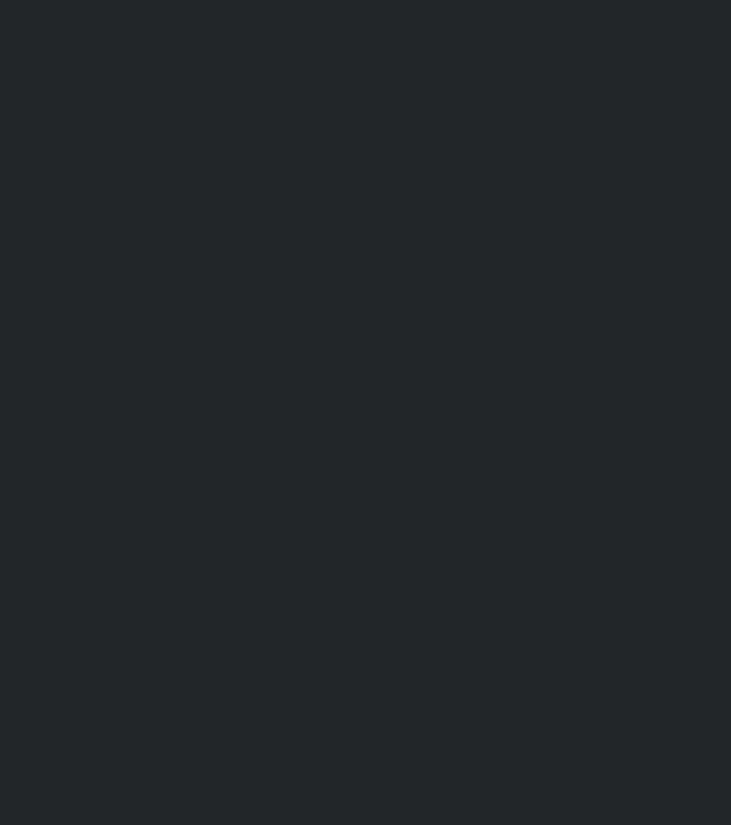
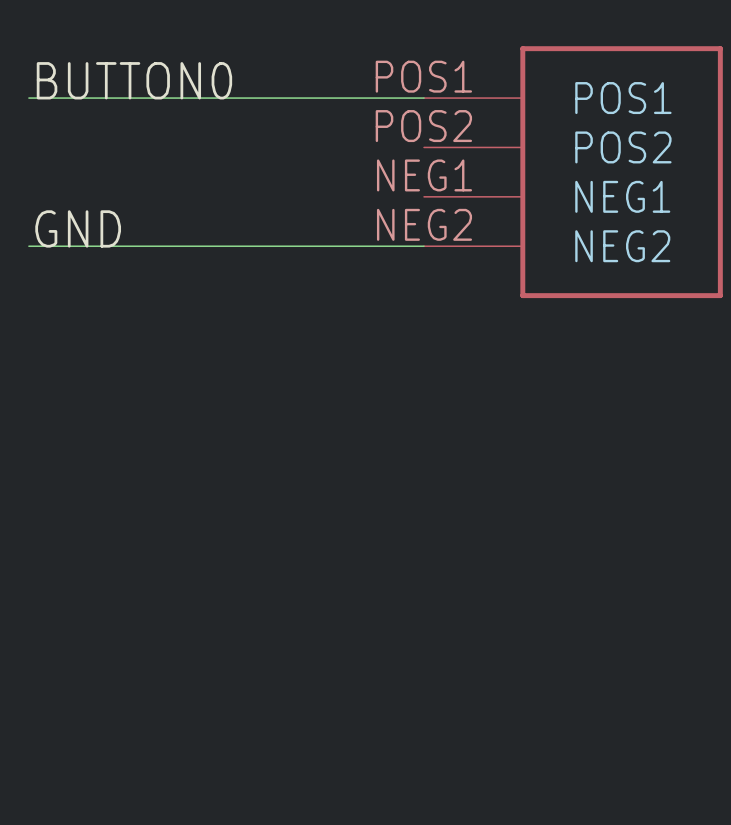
label: none -> BUTTON0 (134, 80)
wire: none -> (28, 98) (424, 98)
part: none -> (573, 172)
label: none -> GND (78, 228)
wire: none -> (28, 246) (424, 246)

